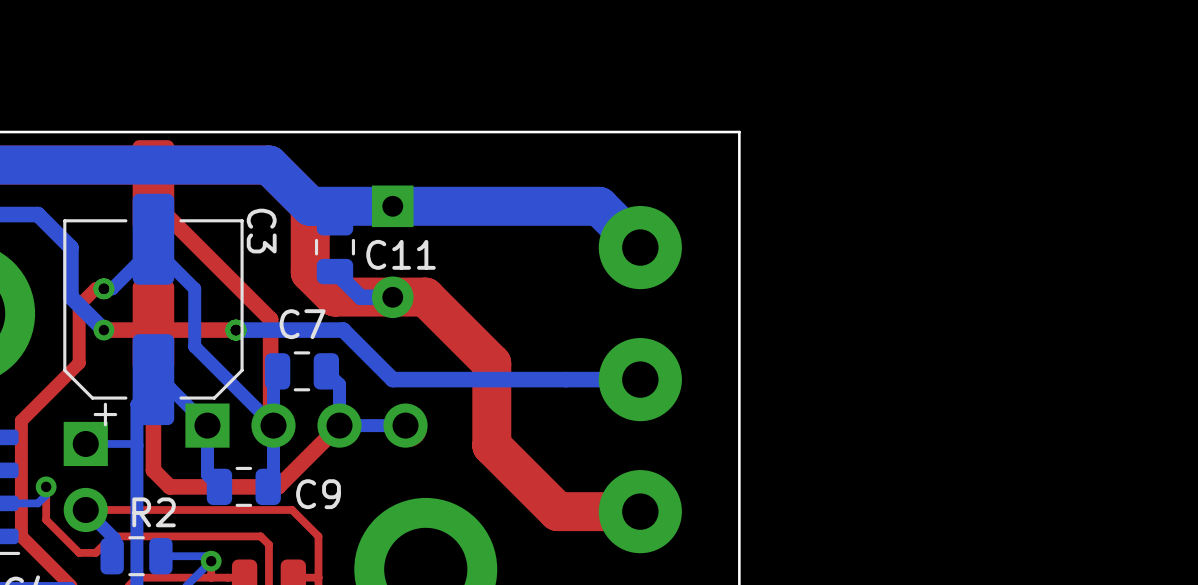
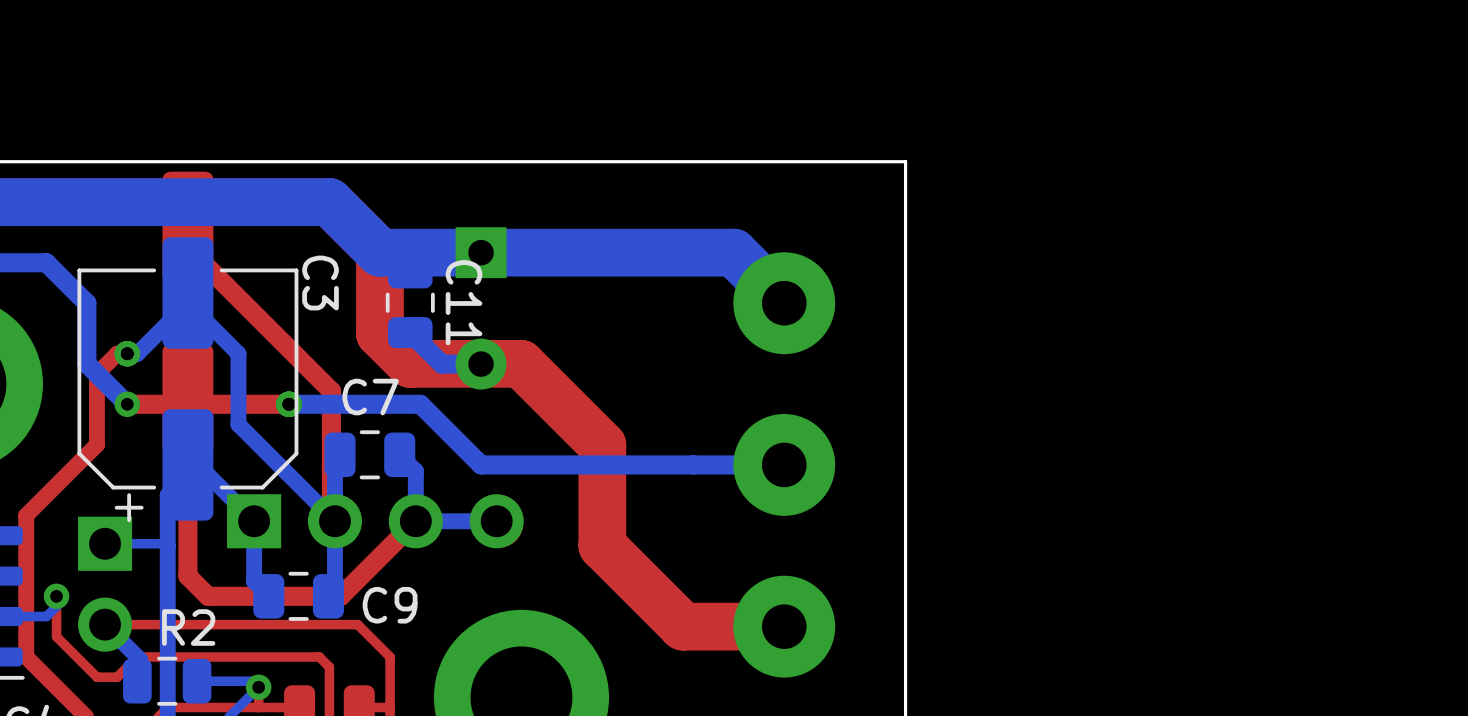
C11 name rotation: 0° (401, 254) -> 90° clockwise (464, 302)

